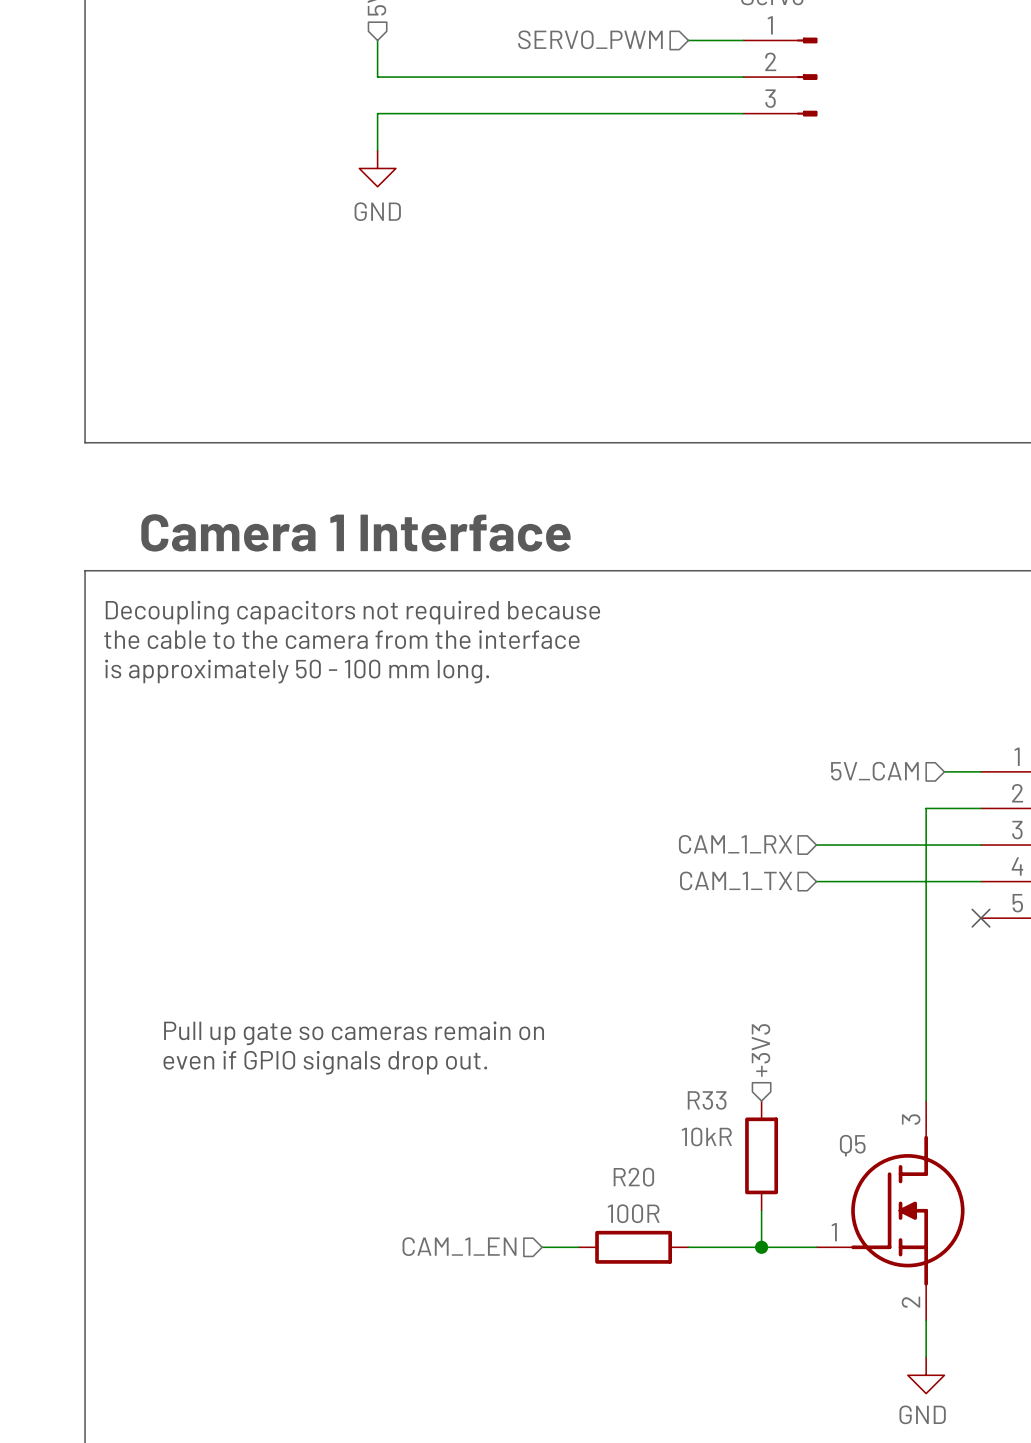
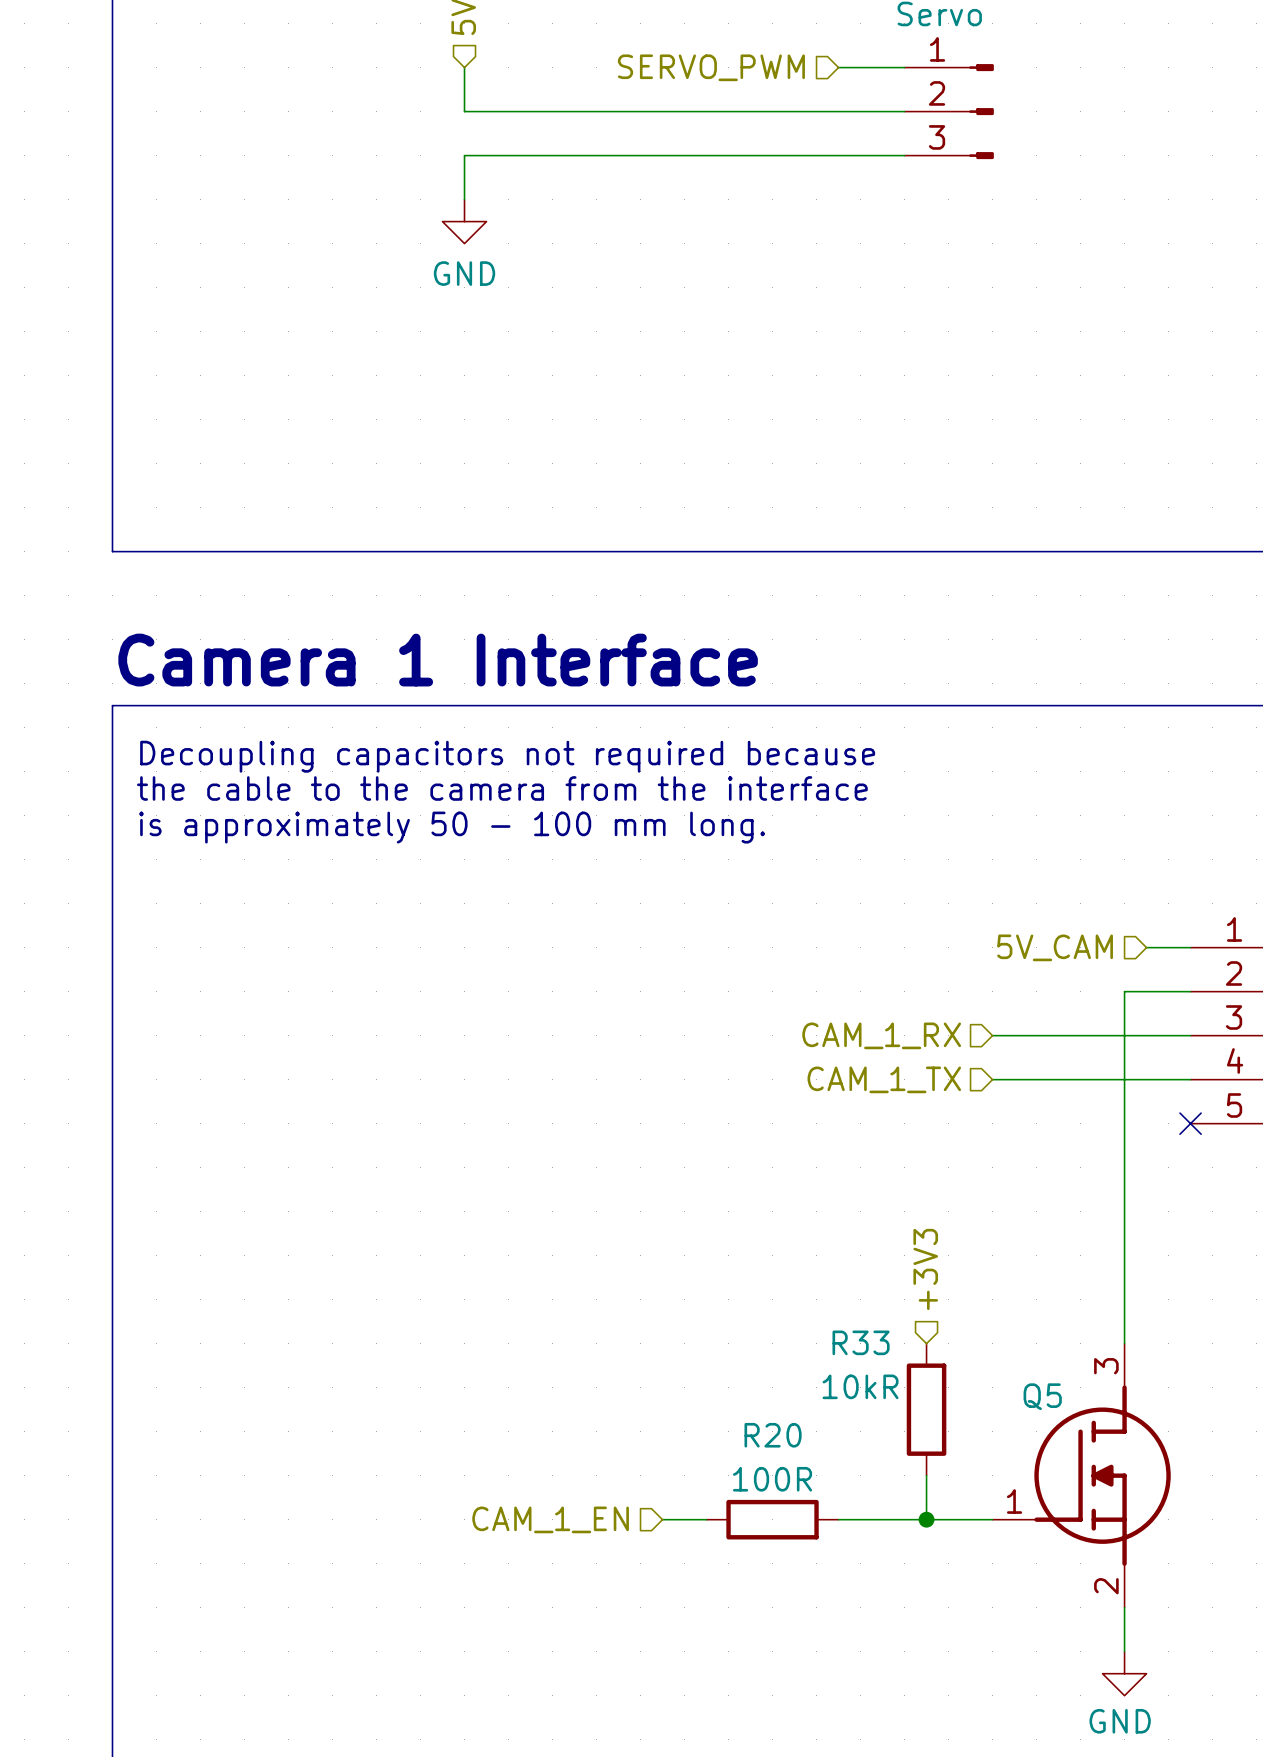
text: Pull up gate so cameras remain on (354, 1033) -> none
text: even if GPIO signals drop out. (325, 1062) -> none

